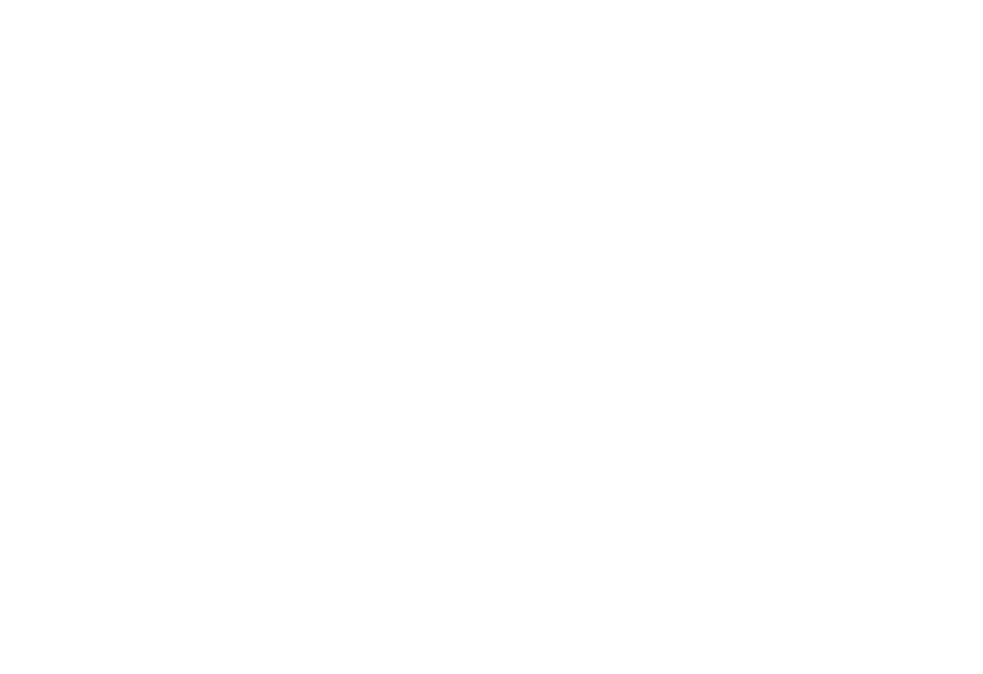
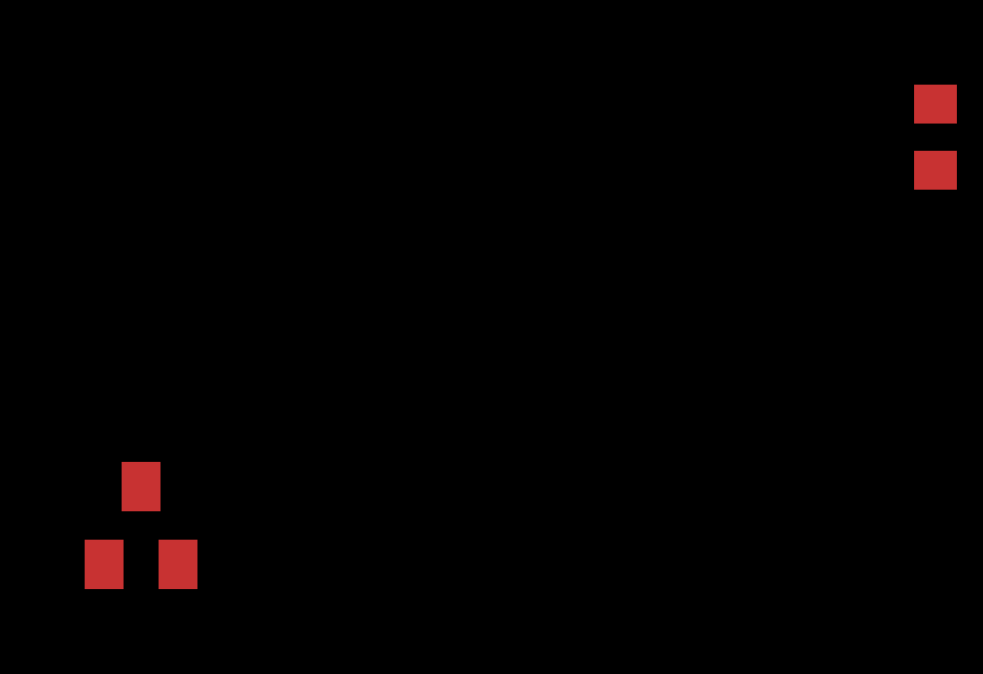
part: none -> (935, 137)
part: none -> (141, 525)

